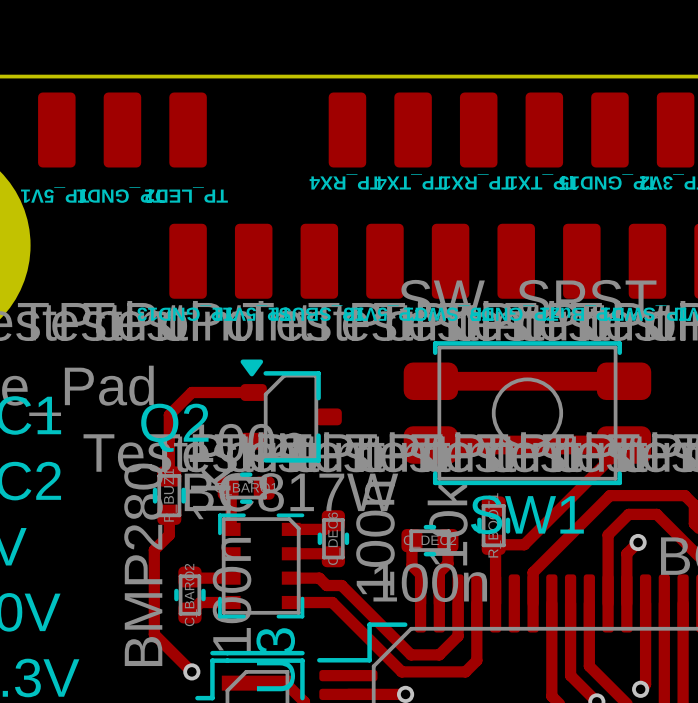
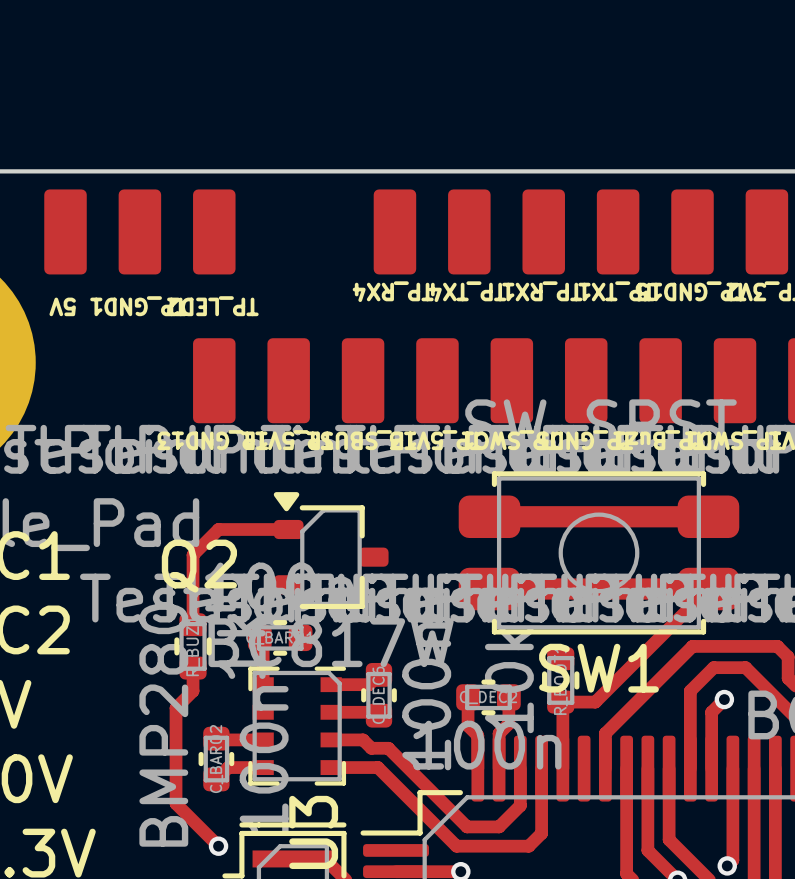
TP_5V1 name: TP_5V1 (55, 194) -> 5V (62, 306)

